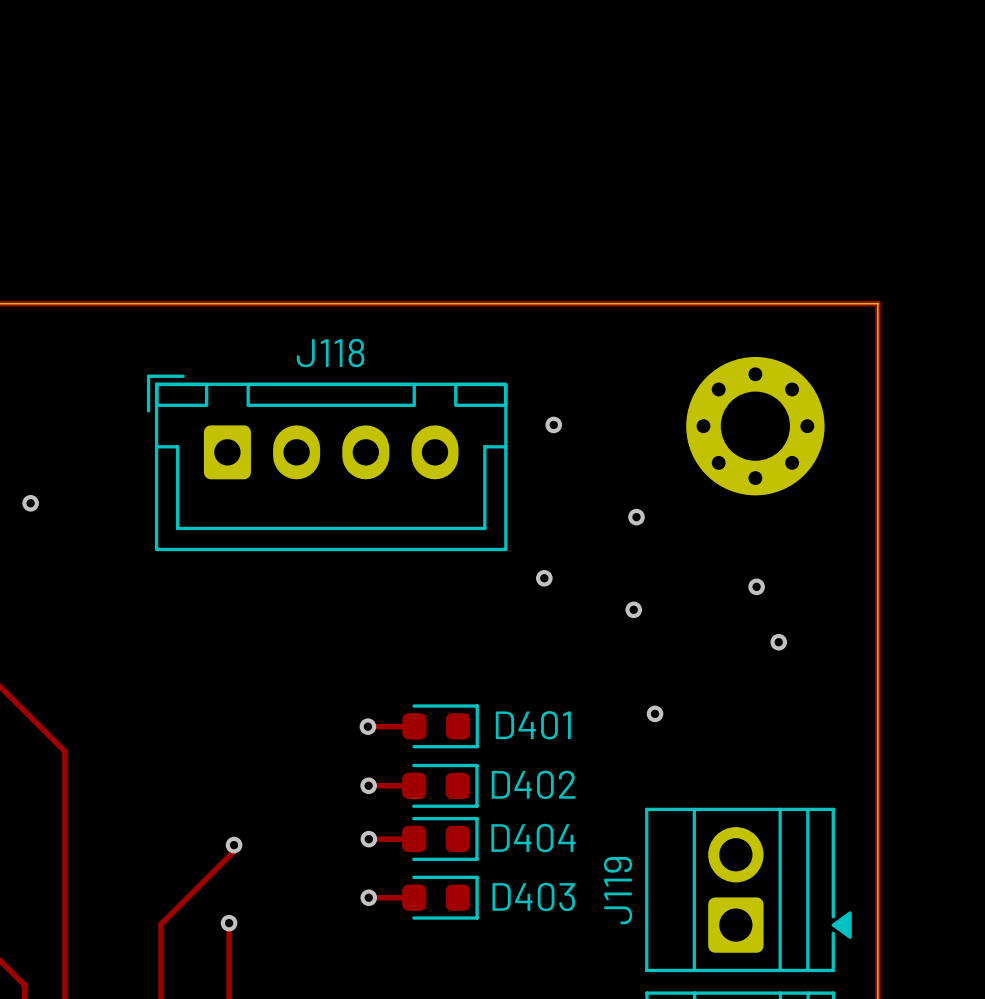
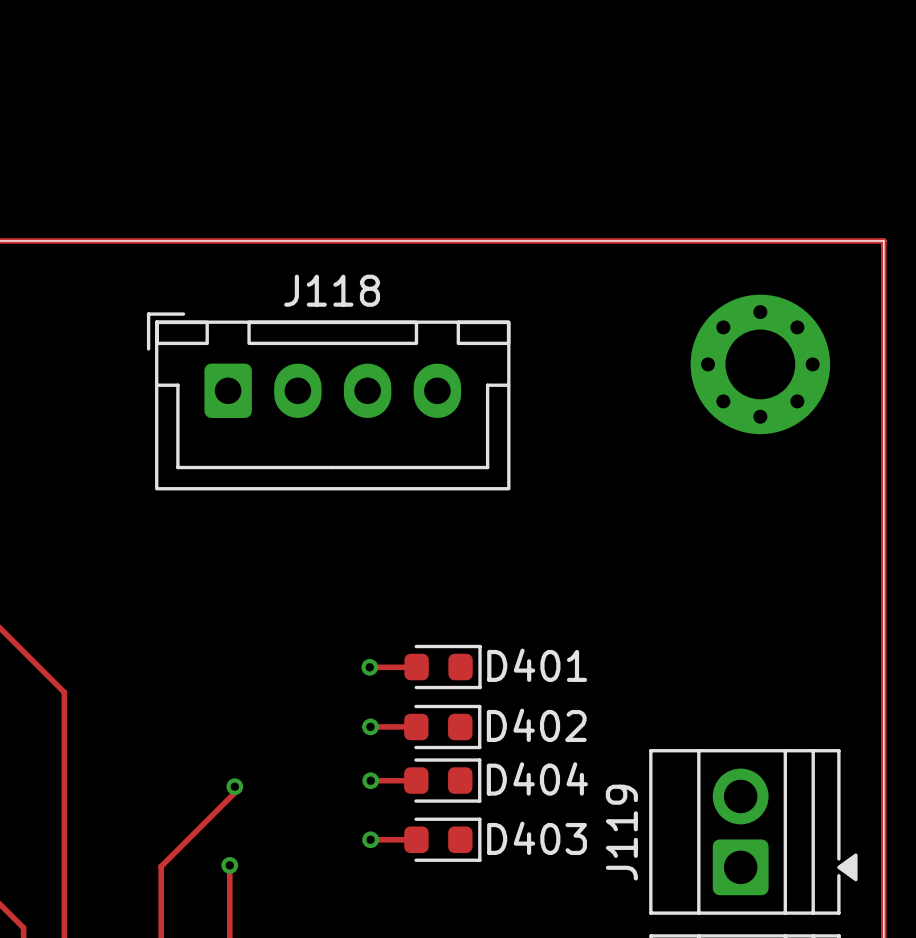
via: (553, 424) -> none
via: (30, 503) -> none
via: (636, 517) -> none
via: (544, 578) -> none
via: (756, 586) -> none
via: (633, 609) -> none
via: (778, 642) -> none
via: (655, 713) -> none

